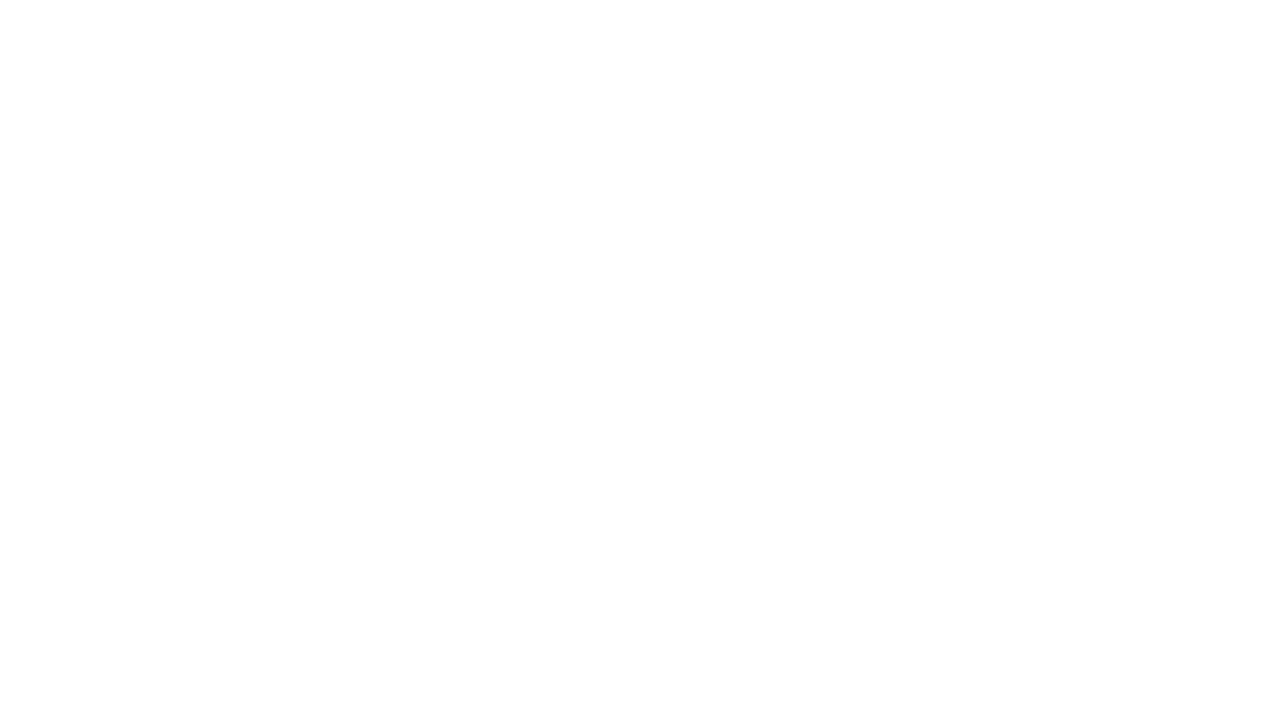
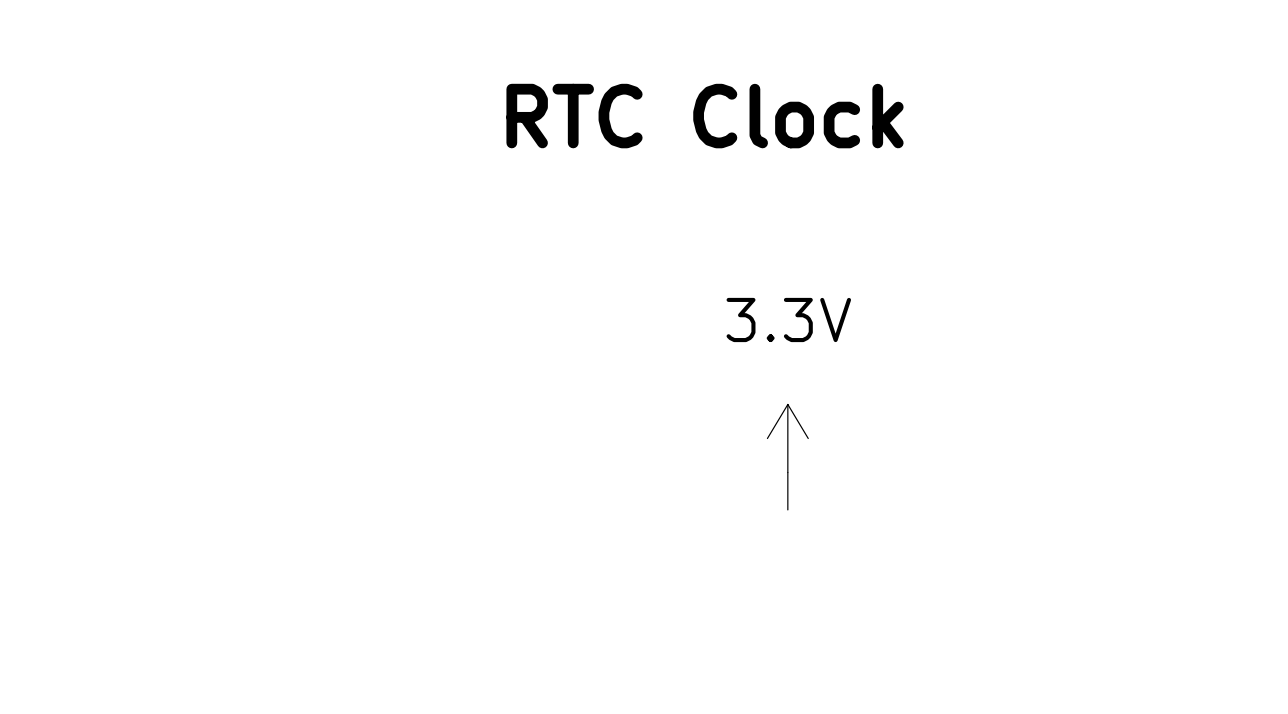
text: none -> RTC Clock (705, 116)
power symbol: none -> 3.3V (787, 438)
wire: none -> (787, 472) (787, 509)

